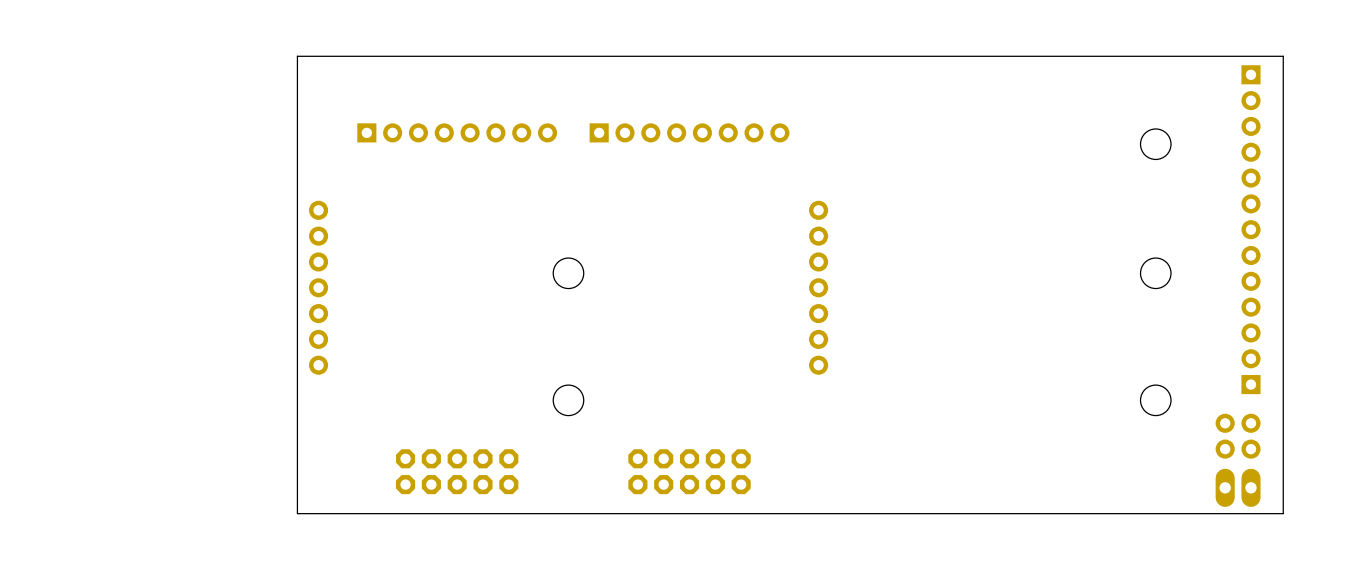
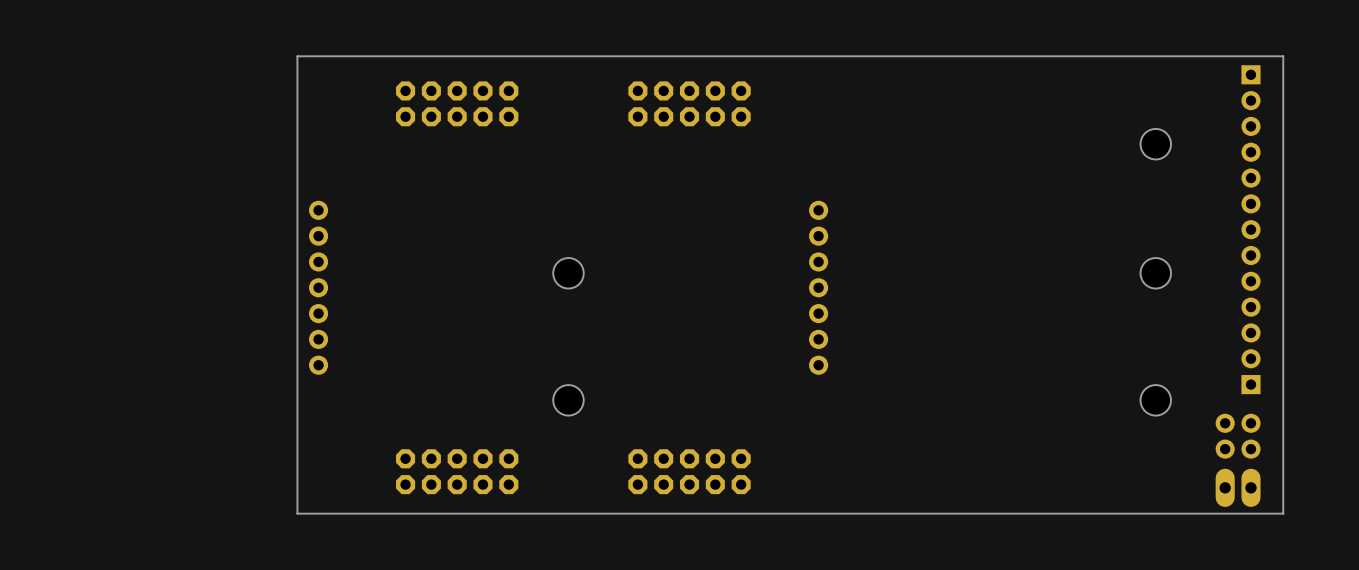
part: none -> (457, 103)
part: none -> (689, 103)
part: (457, 132) -> none
part: (689, 132) -> none

